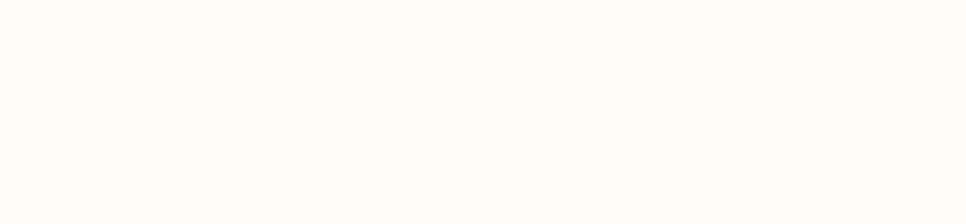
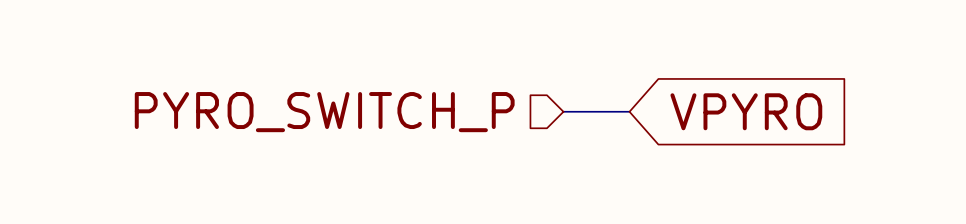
wire: none -> (563, 111) (629, 111)
global label: none -> VPYRO (746, 111)
hierarchical label: none -> PYRO_SWITCH_P (324, 112)

